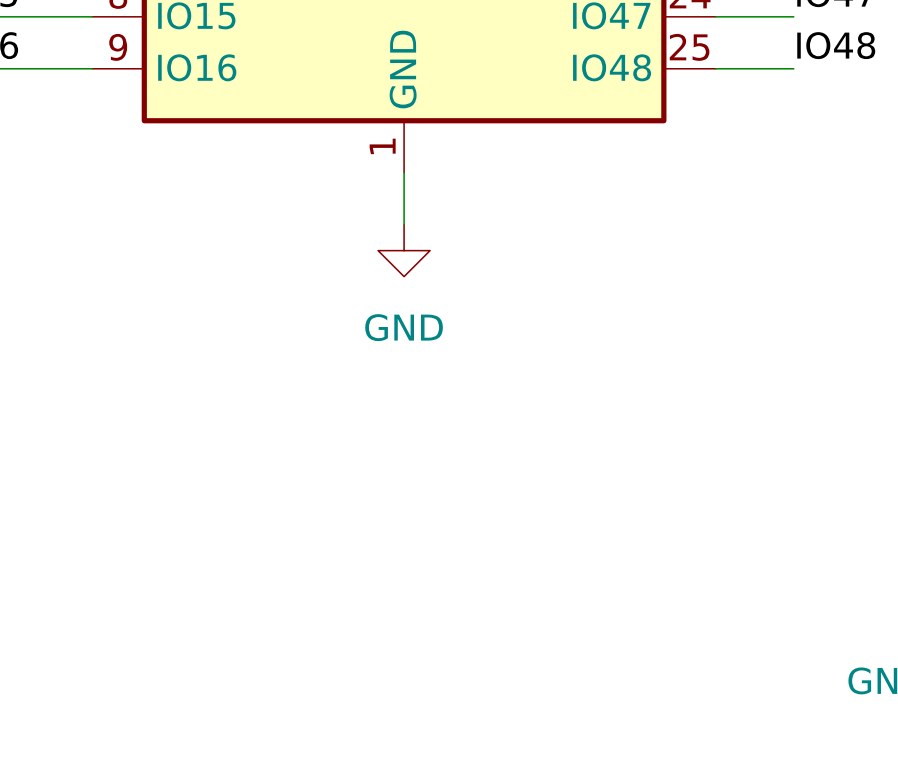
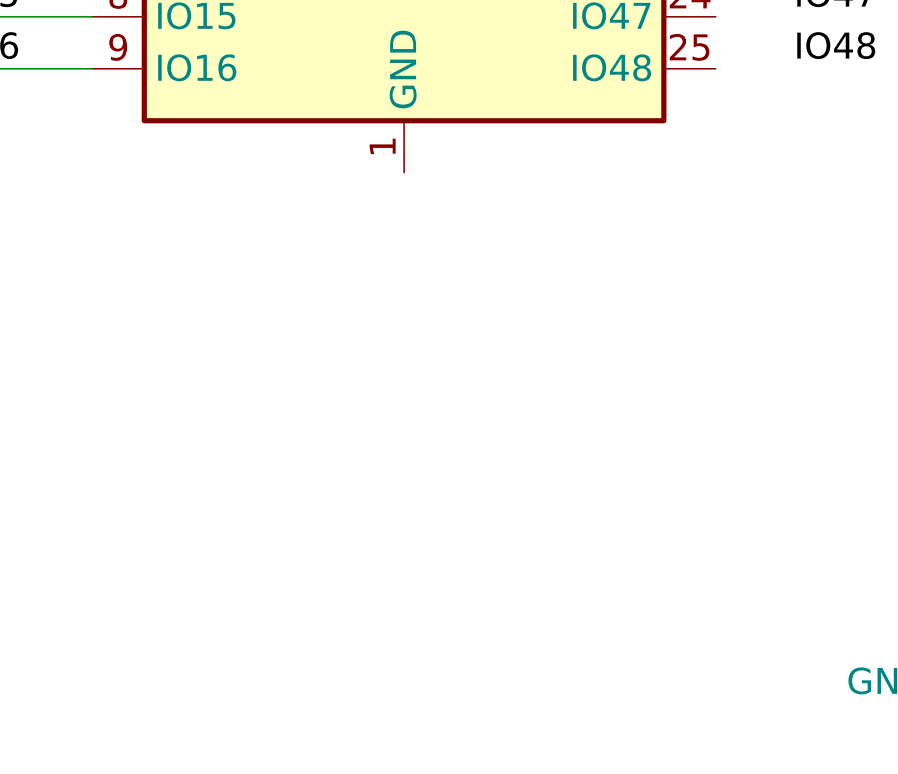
wire: (715, 16) (793, 16) -> none
wire: (715, 68) (793, 68) -> none
wire: (404, 172) (404, 224) -> none
power symbol: GND (404, 250) -> none

